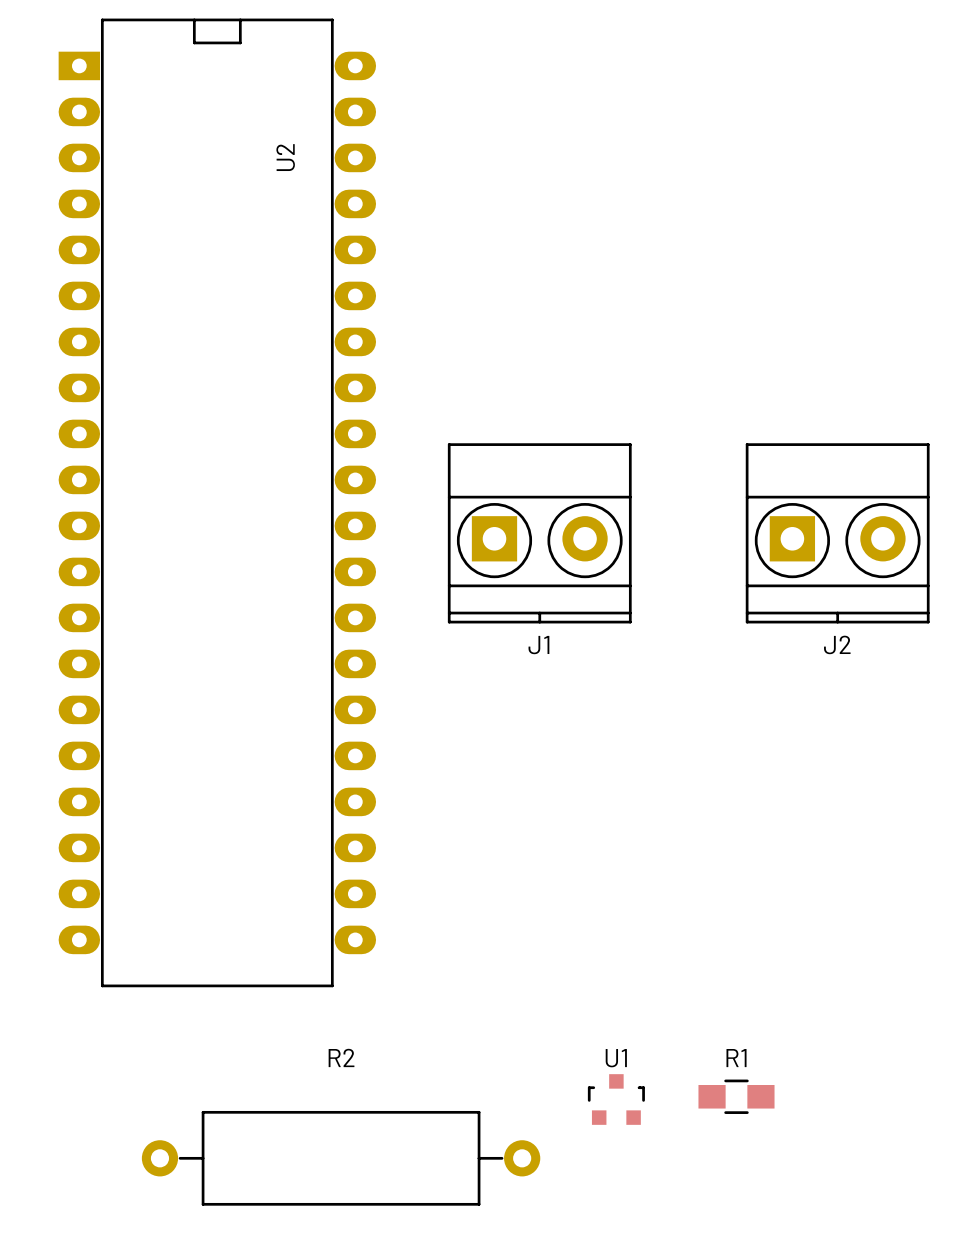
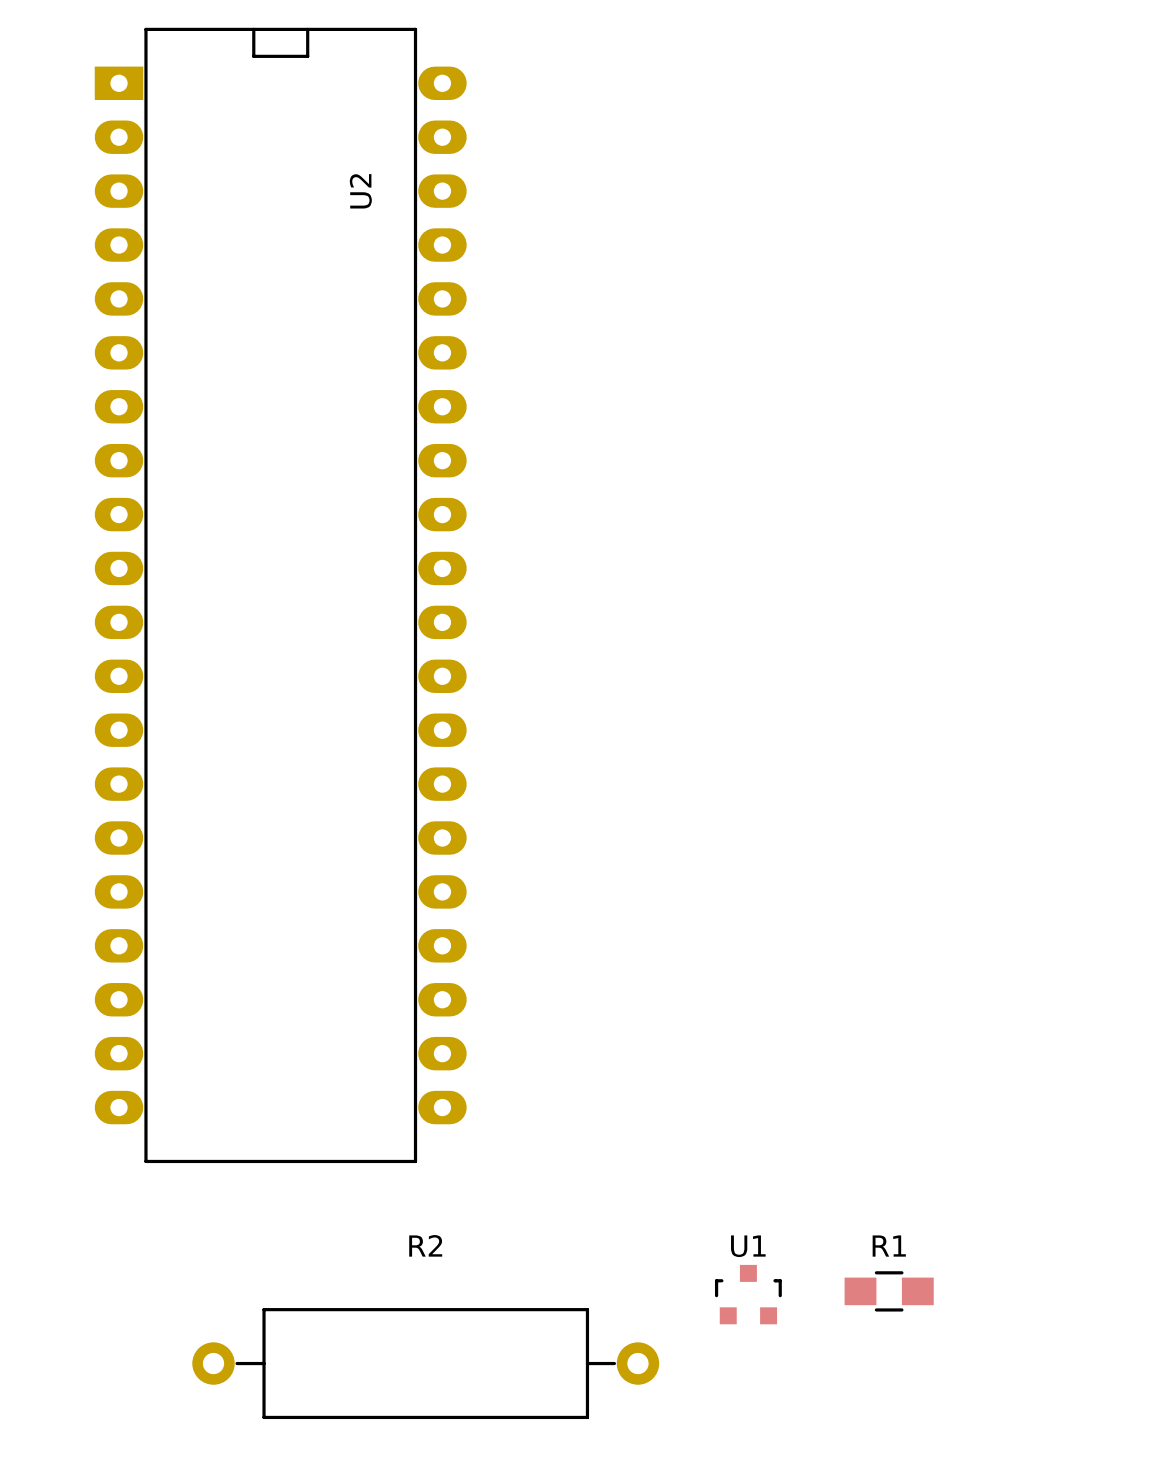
J1: (539, 533) -> none
J2: (837, 533) -> none

